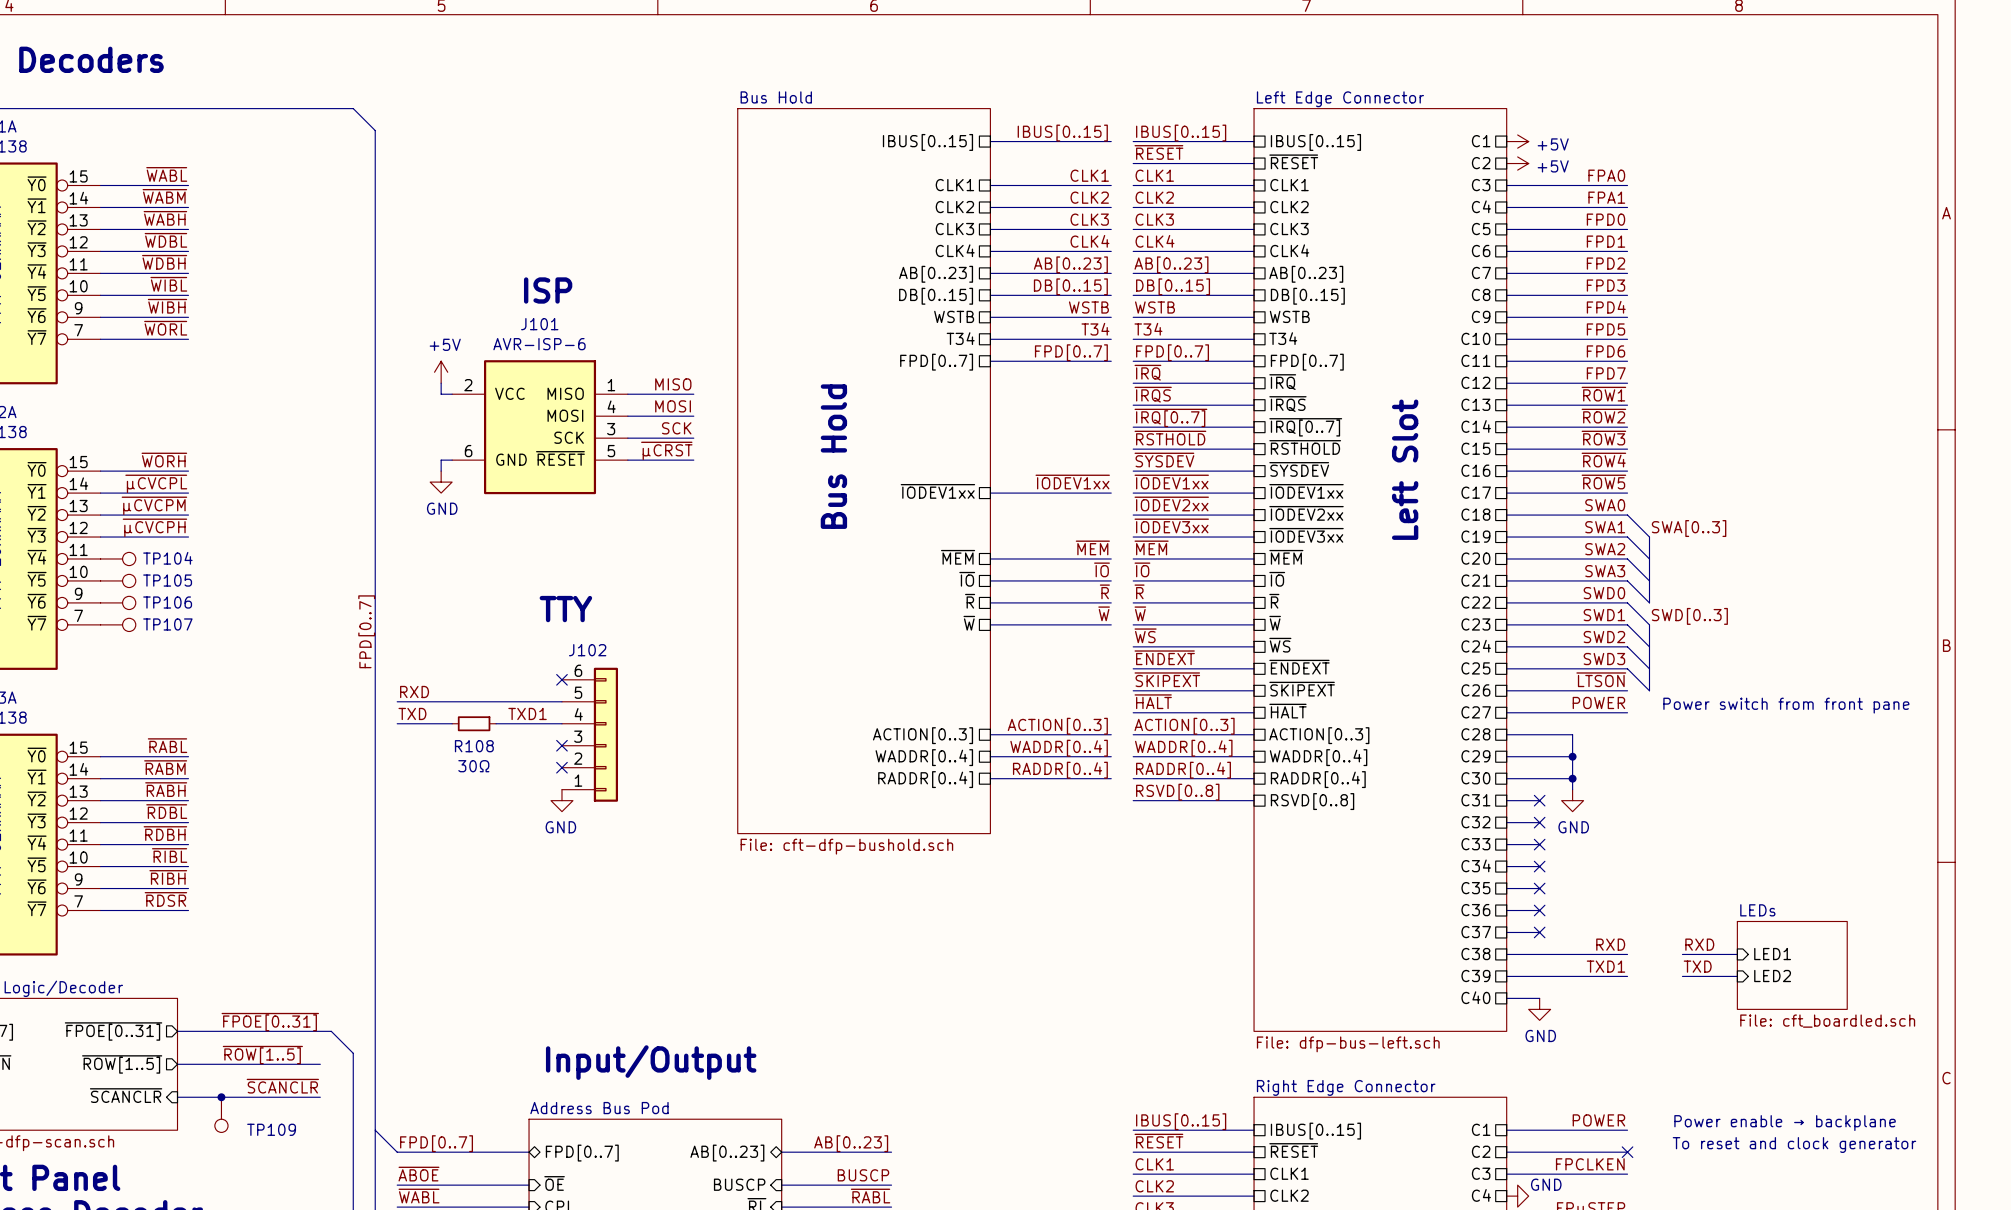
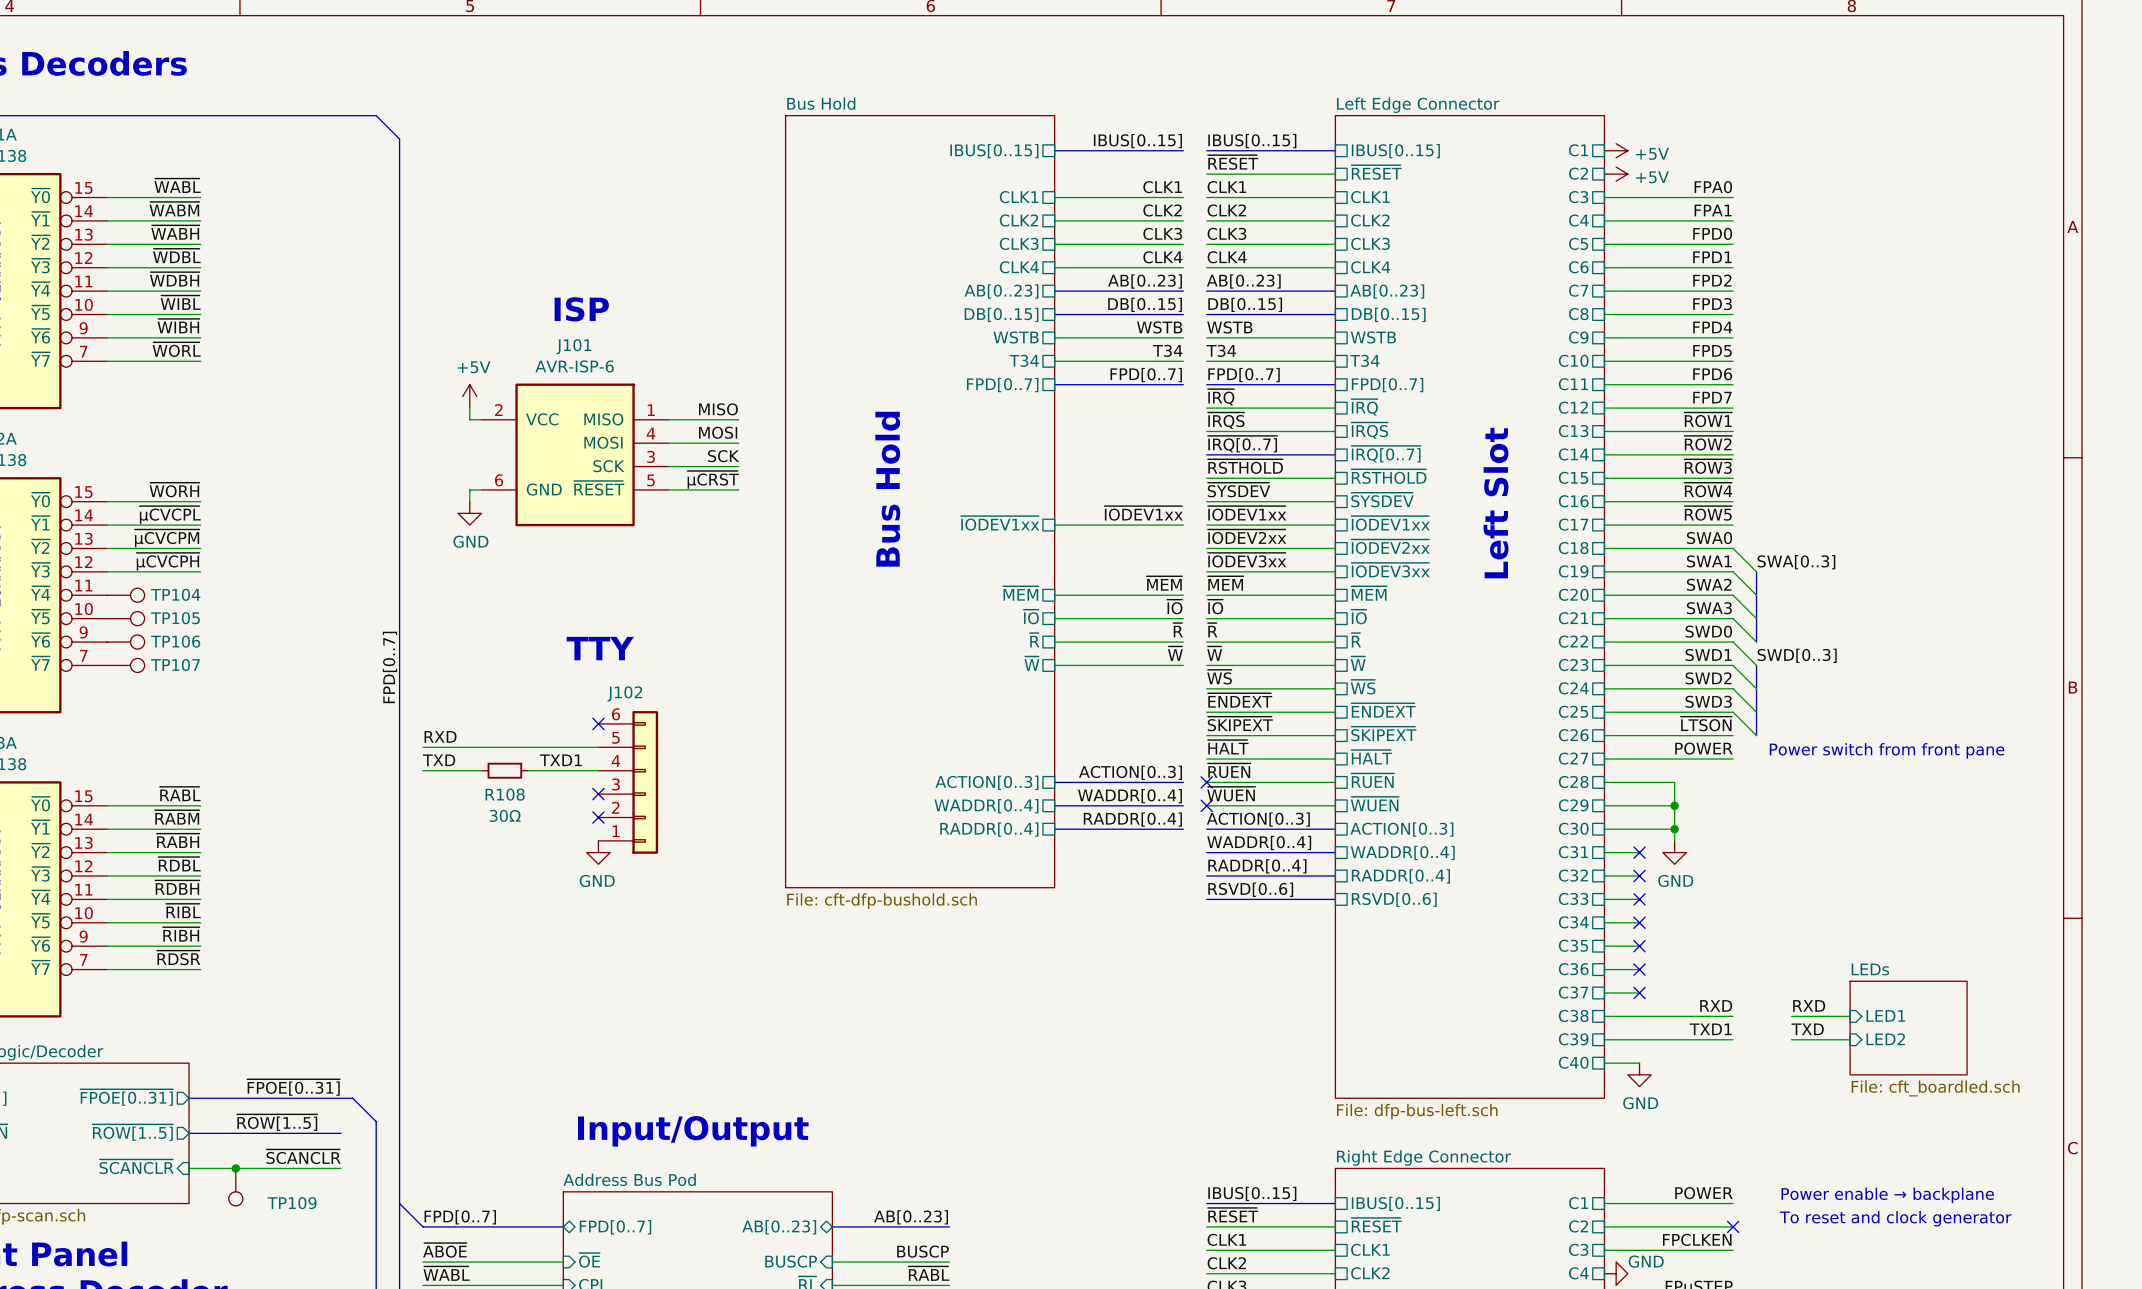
label: ACTION[0..3] (1184, 726) -> ~{RUEN} (1229, 770)
bus: (1133, 734) (1254, 734) -> (1206, 876) (1335, 876)
no-connect mark: none -> (1206, 782)
sheet pin: ACTION[0..3] (1319, 735) -> ~{RUEN} (1372, 780)
label: WADDR[0..4] (1183, 748) -> ~{WUEN} (1231, 794)
bus: (1133, 756) (1254, 756) -> (1206, 899) (1335, 899)
no-connect mark: none -> (1206, 805)
sheet pin: WADDR[0..4] (1318, 757) -> ~{WUEN} (1374, 804)
label: RADDR[0..4] (1183, 770) -> ACTION[0..3] (1258, 819)
sheet pin: RADDR[0..4] (1318, 779) -> ACTION[0..3] (1401, 829)
label: RSVD[0..8] (1177, 792) -> WADDR[0..4] (1259, 842)
sheet pin: RSVD[0..8] (1312, 801) -> WADDR[0..4] (1402, 852)
label: none -> RADDR[0..4] (1257, 866)
sheet pin: none -> RADDR[0..4] (1400, 876)
label: none -> RSVD[0..6] (1250, 889)
sheet pin: none -> RSVD[0..6] (1394, 899)

